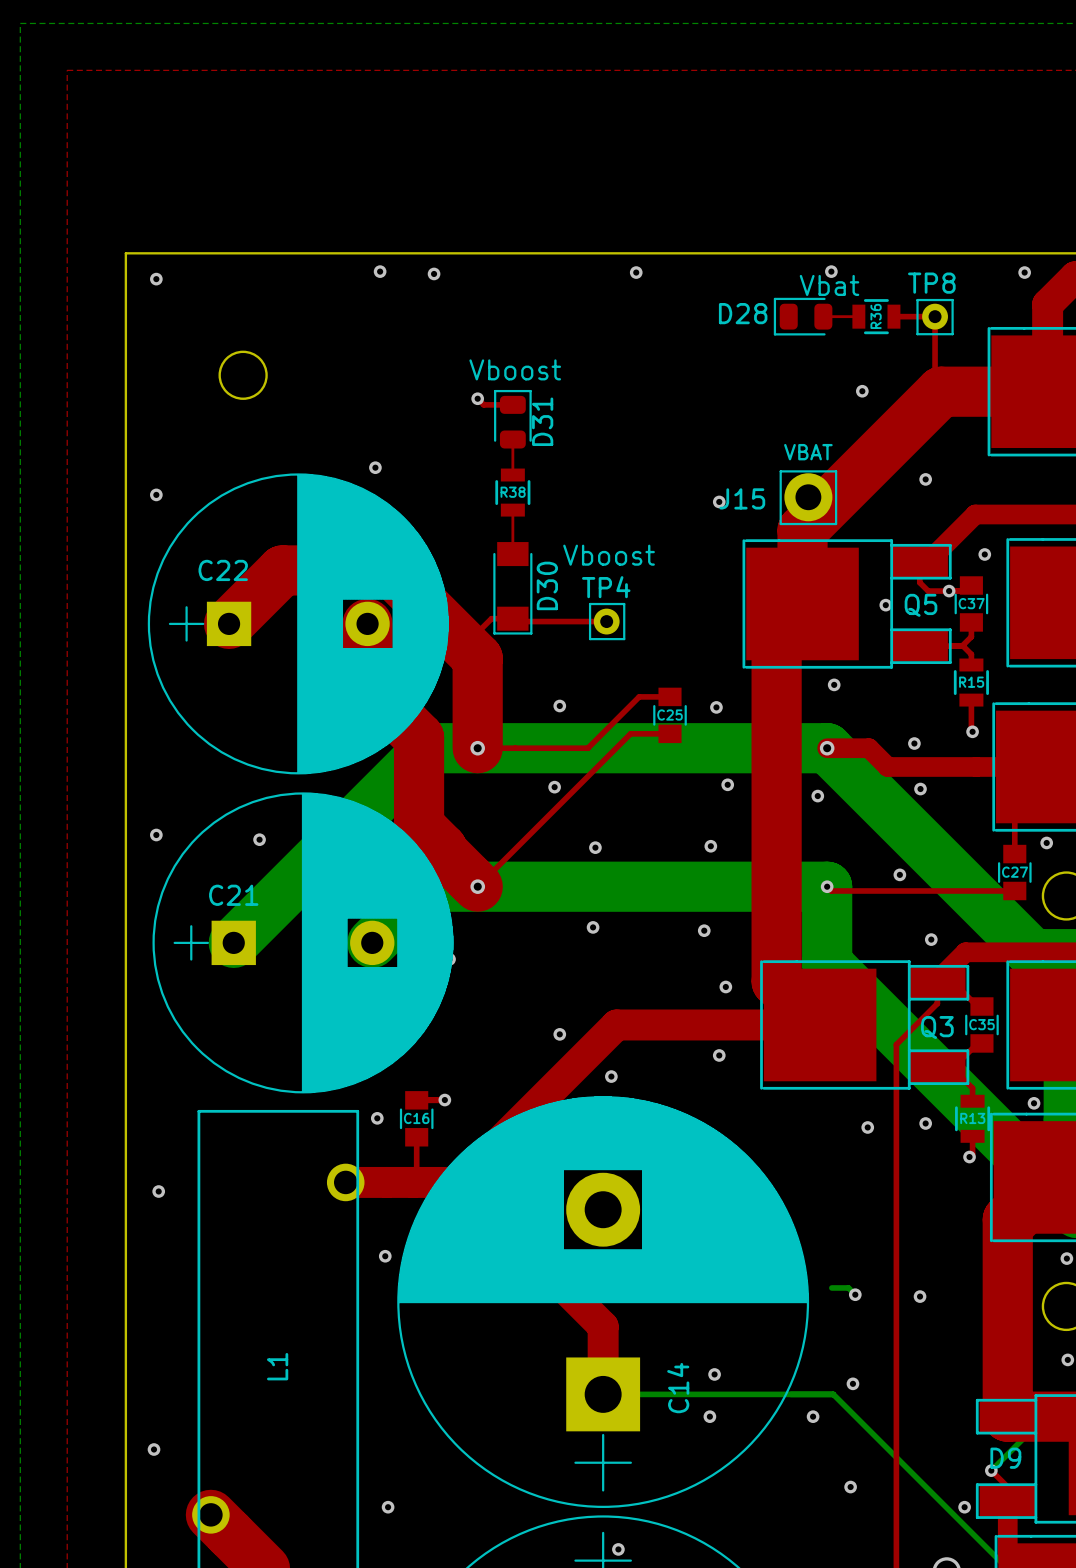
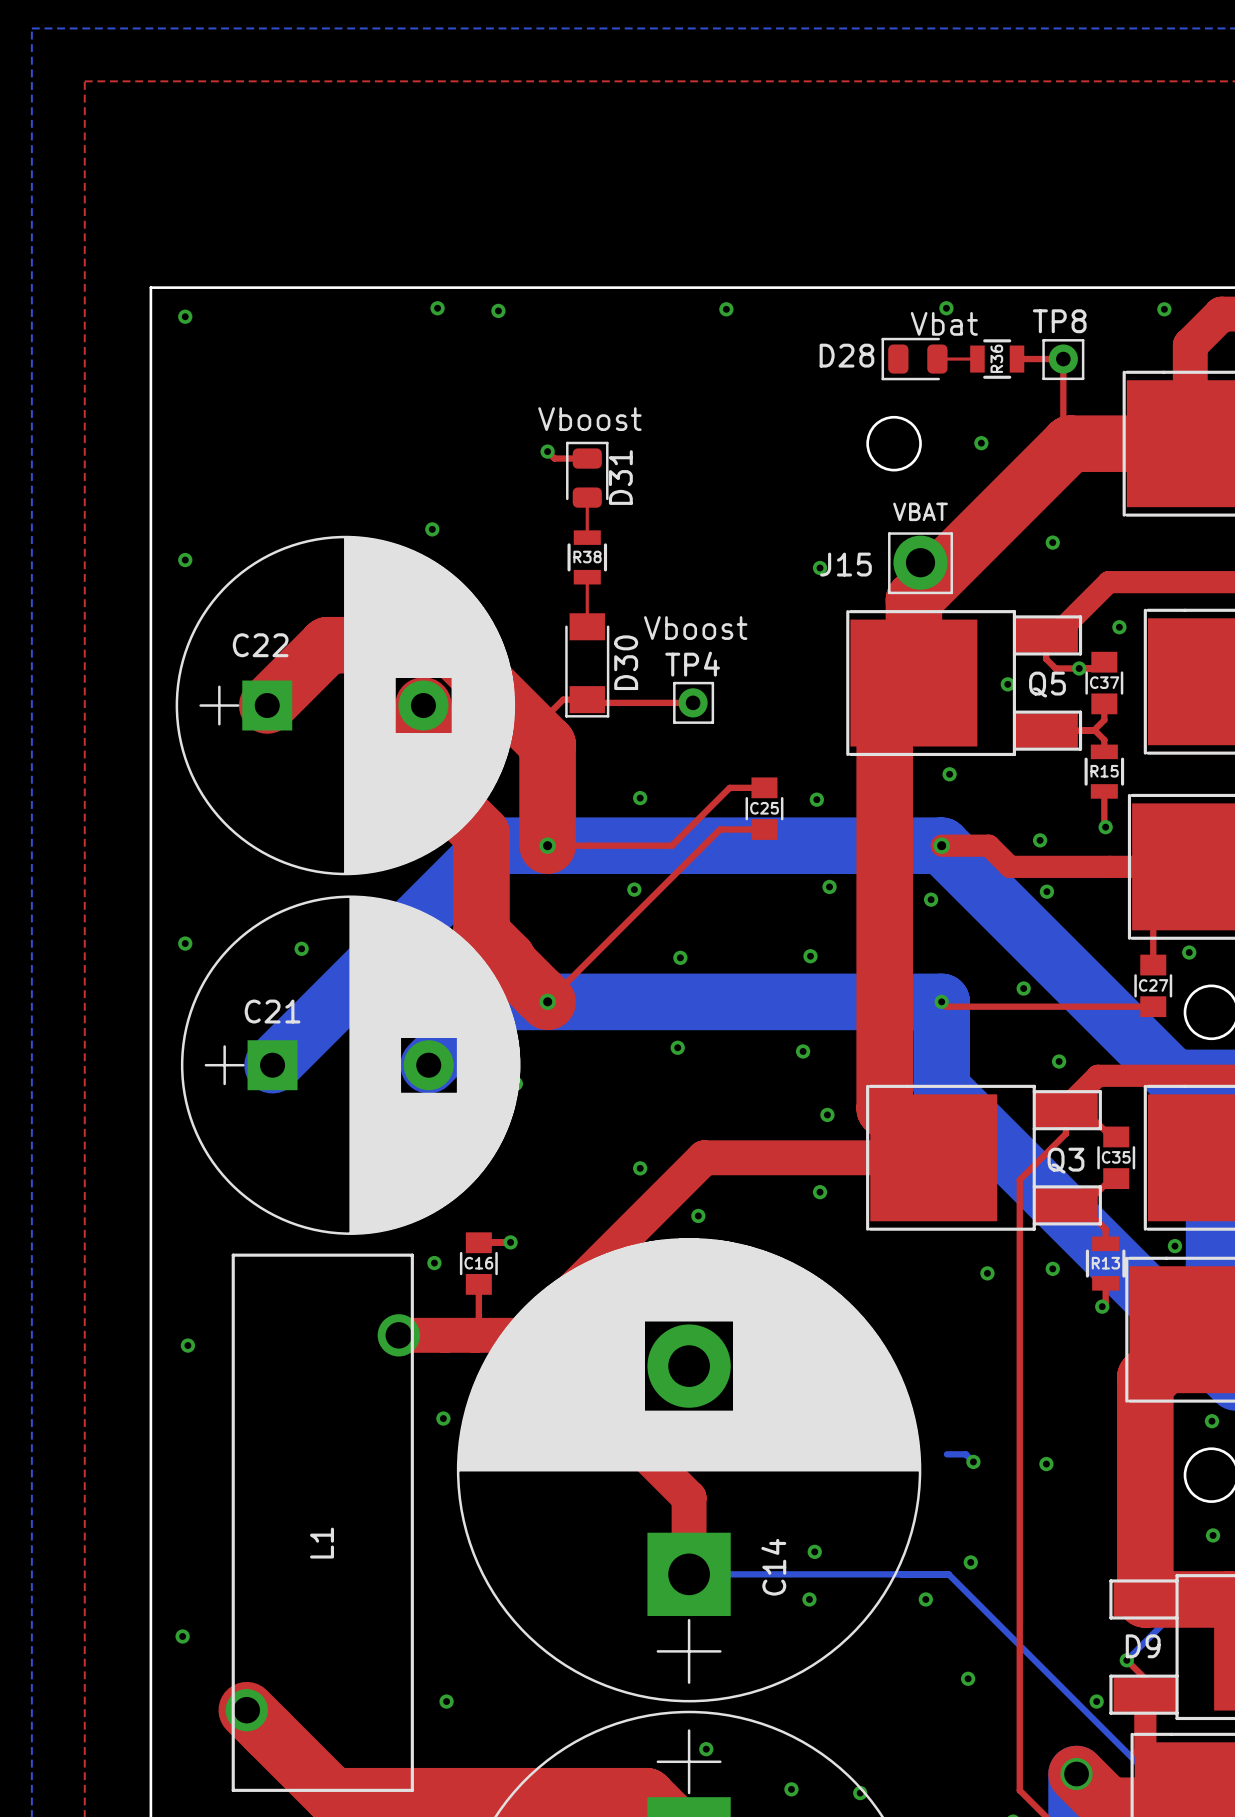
round board edge: [218, 350, 268, 400] -> none
round board edge: none -> [866, 415, 922, 472]

